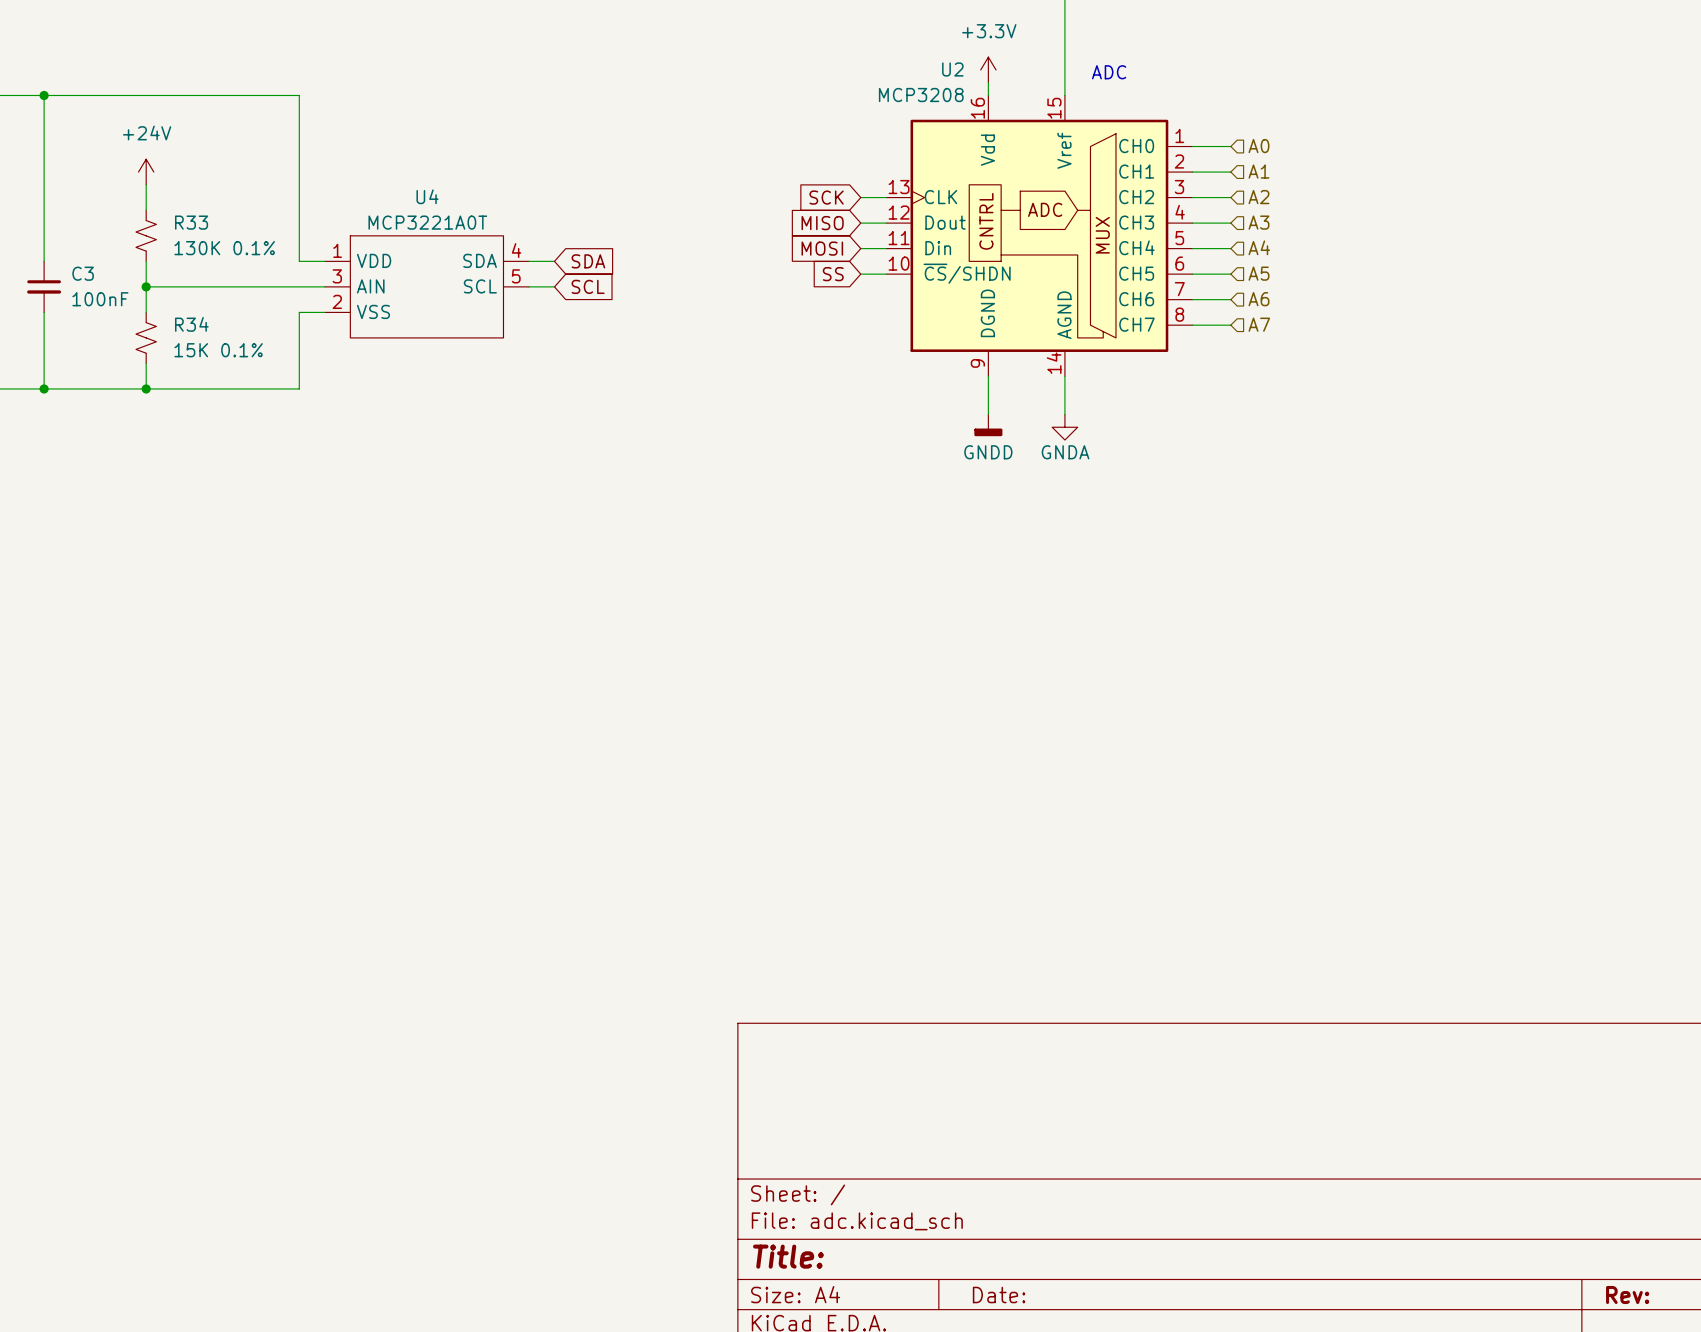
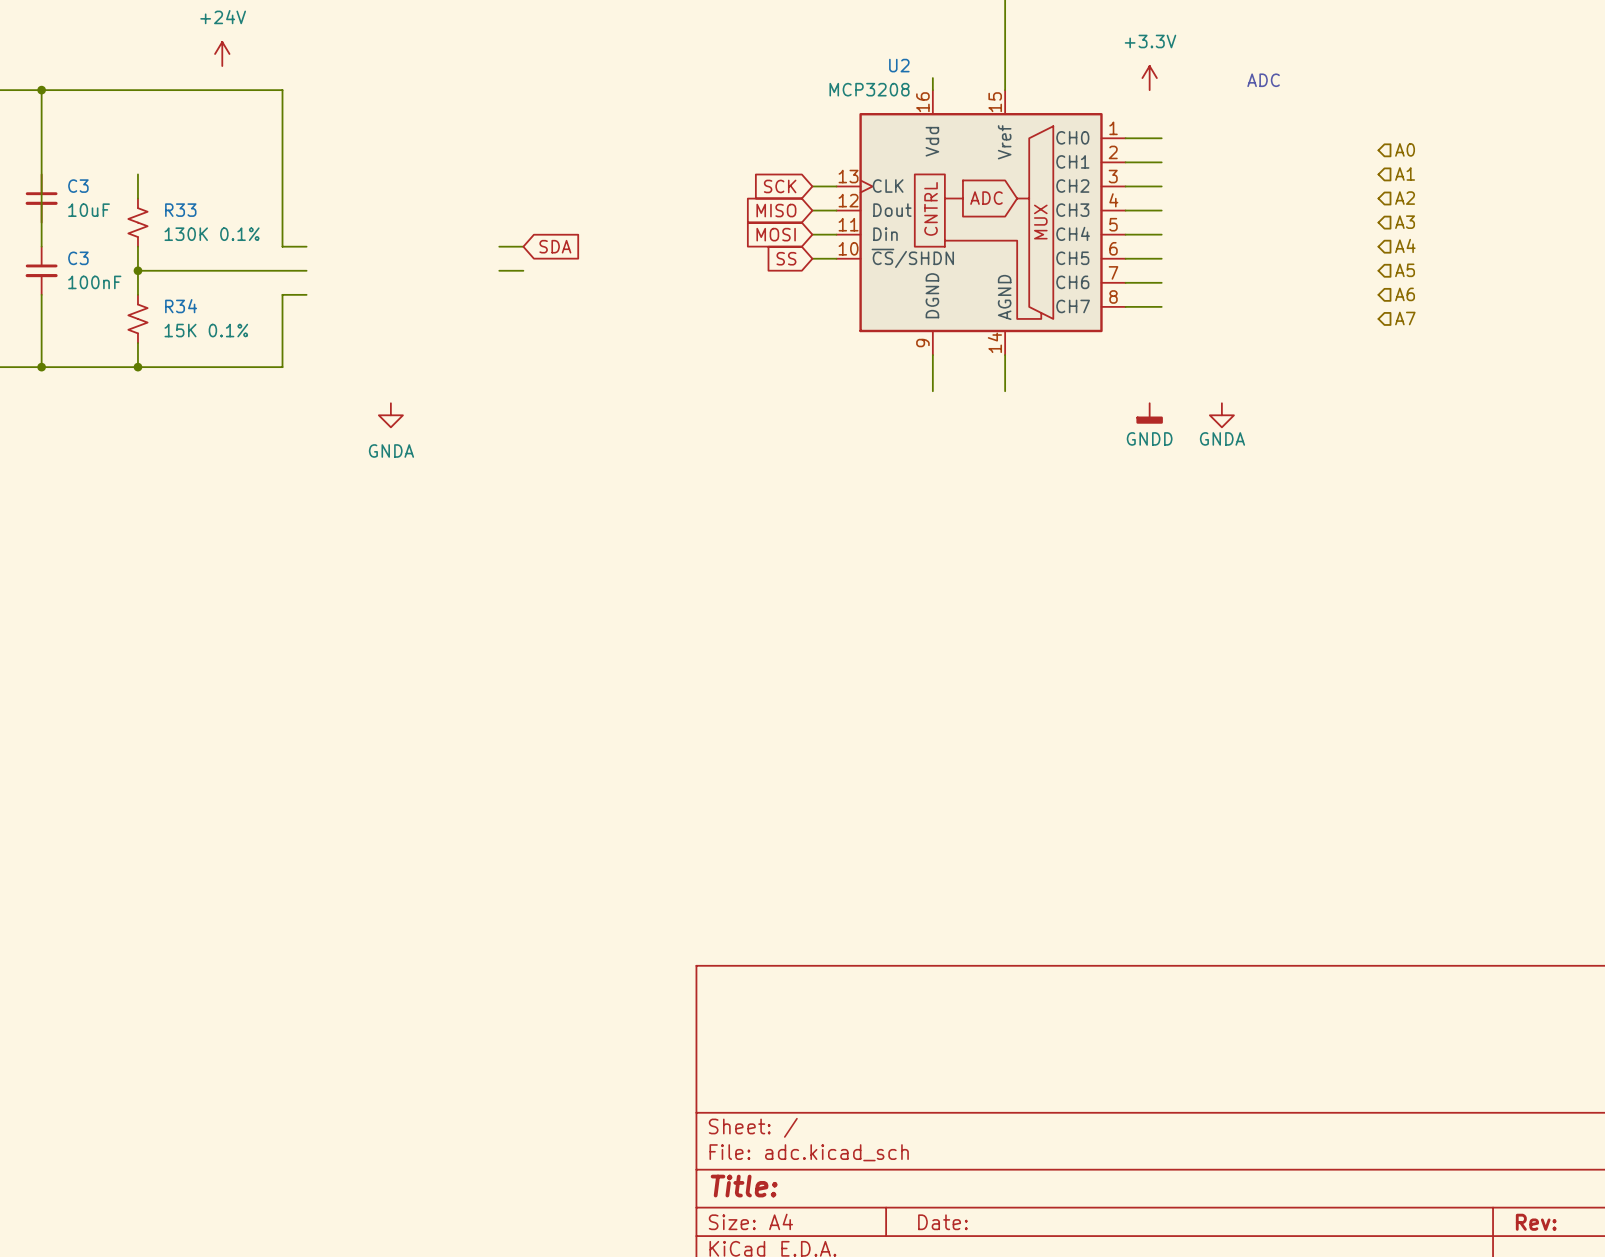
power symbol position: +3.3V (988, 69) -> +3.3V (1149, 78)
text: ADC (1109, 72) -> none
text: none -> ADC (1263, 80)
hierarchical label position: A0 (1258, 146) -> A0 (1405, 149)
hierarchical label position: A1 (1258, 171) -> A1 (1405, 173)
power symbol position: +24V (146, 172) -> +24V (222, 53)
hierarchical label position: A2 (1258, 197) -> A2 (1405, 198)
C3: none -> 10uF (41, 198)
hierarchical label position: A3 (1258, 222) -> A3 (1405, 222)
hierarchical label position: A4 (1259, 247) -> A4 (1405, 245)
hierarchical label position: A5 (1258, 273) -> A5 (1405, 270)
U4: MCP3221A0T (426, 286) -> none
global label: SCL (588, 286) -> none
hierarchical label position: A6 (1258, 299) -> A6 (1405, 294)
hierarchical label position: A7 (1259, 324) -> A7 (1405, 318)
power symbol position: GNDD (988, 425) -> GNDD (1149, 413)
power symbol position: GNDA (1064, 427) -> GNDA (1221, 415)
power symbol: none -> GNDA (390, 415)

